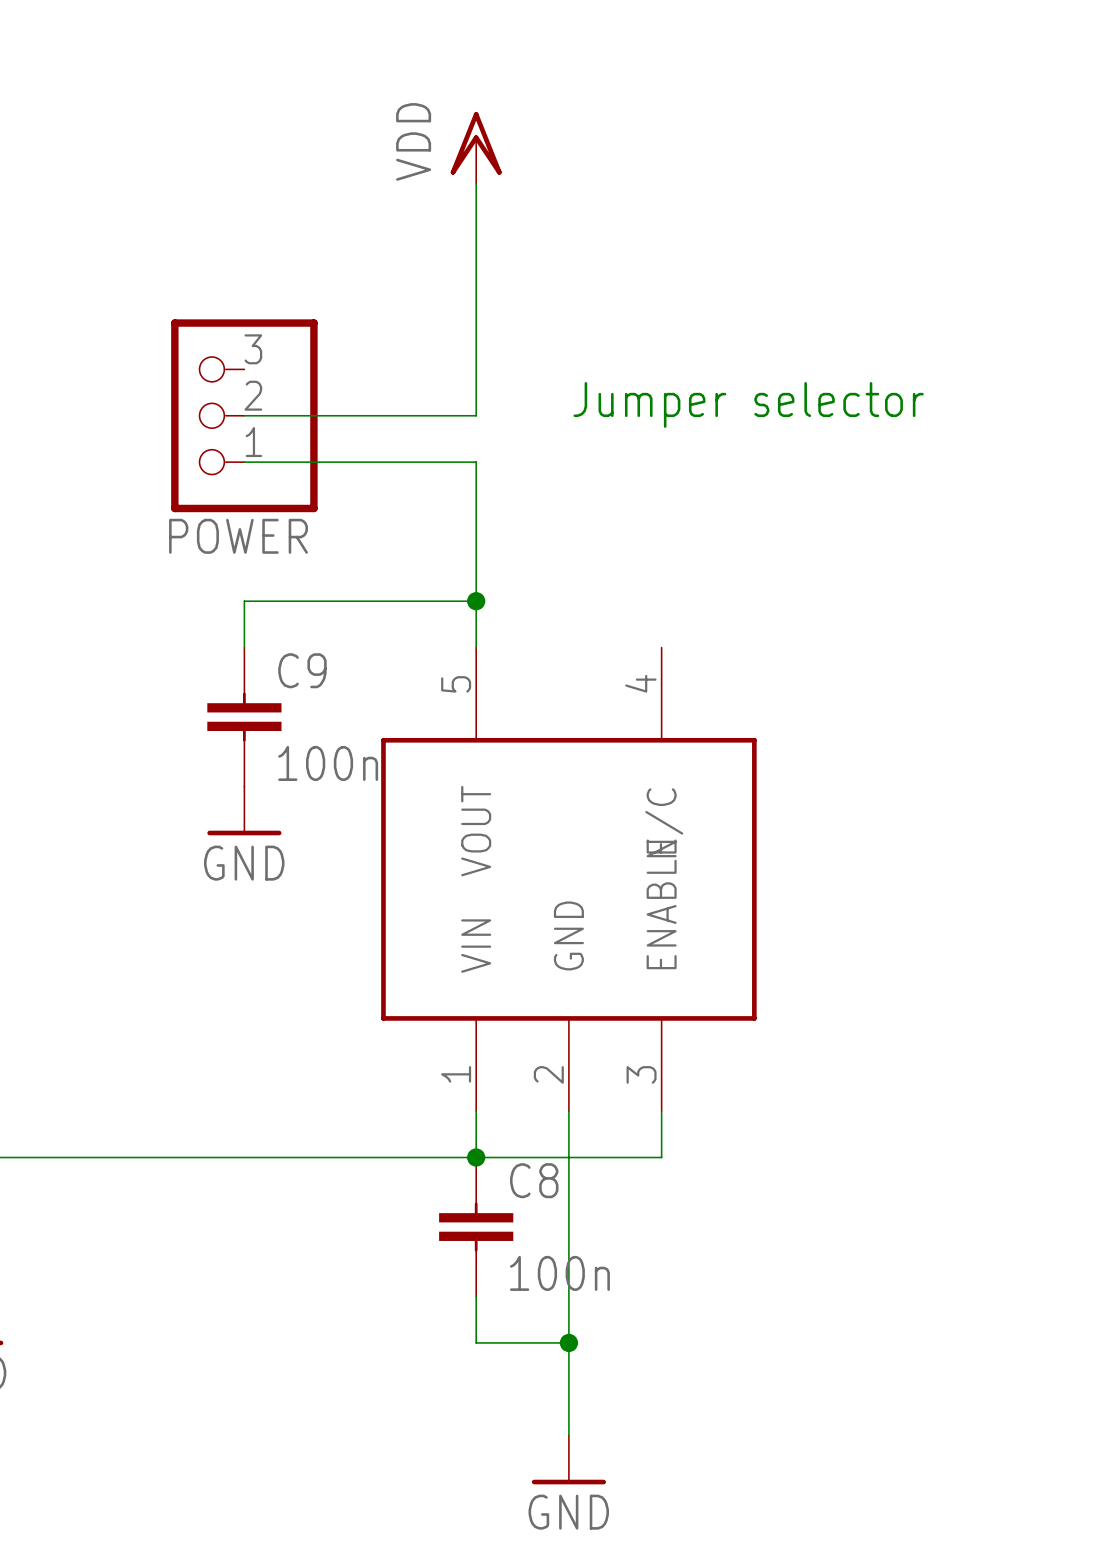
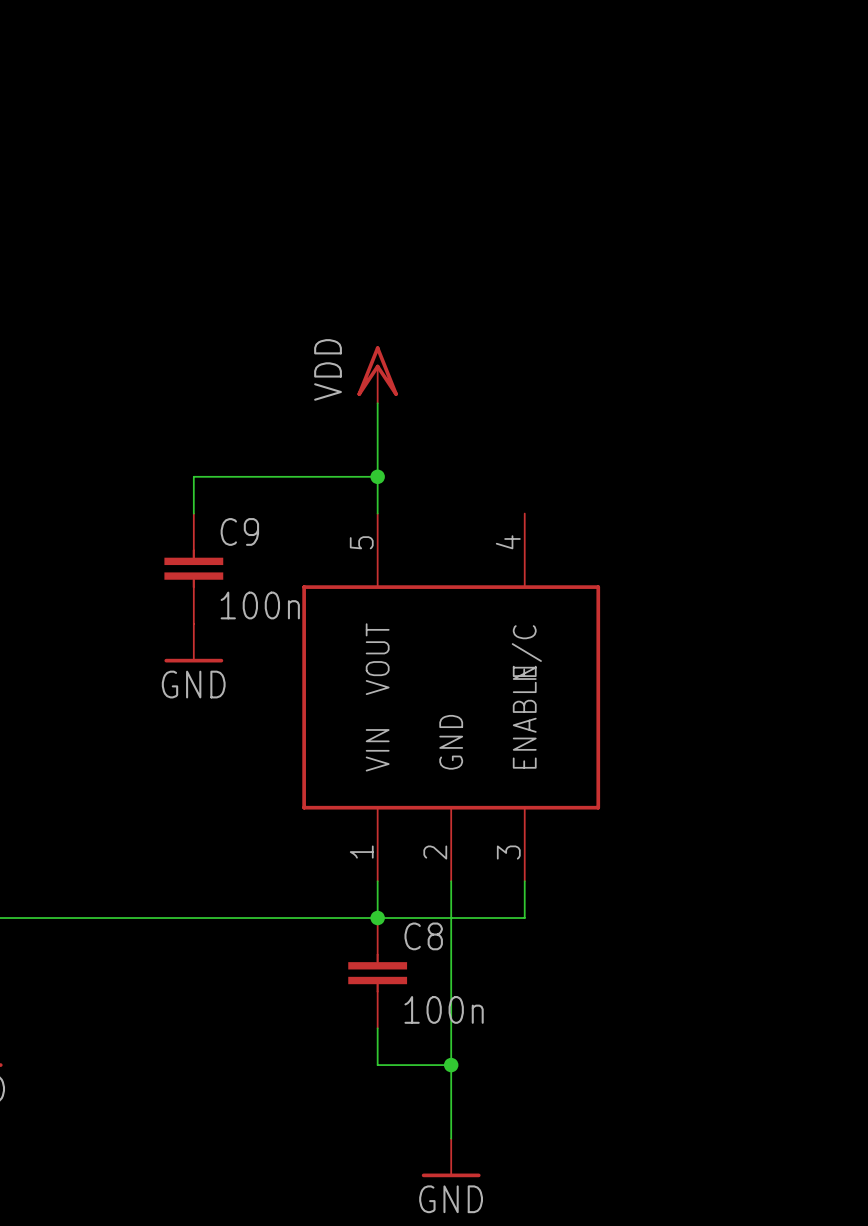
power symbol position: VDD (476, 148) -> VDD (377, 374)
wire: (476, 183) (476, 415) (244, 415) -> none
text: Jumper selector (748, 404) -> none
POWER: (244, 415) -> none
wire: (244, 462) (476, 462) (476, 508) -> none

